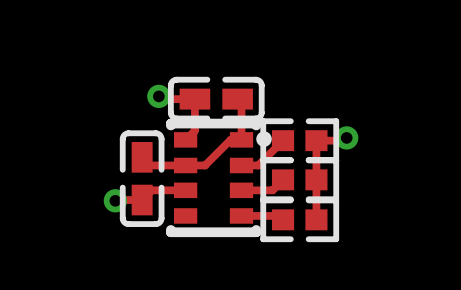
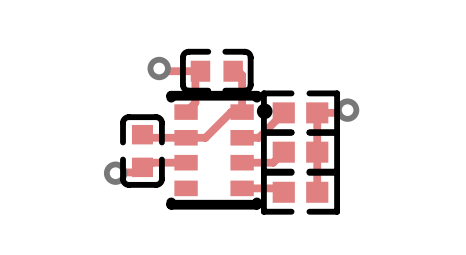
part footprint: [167, 76, 265, 122] -> [180, 48, 254, 94]
part footprint: [119, 130, 165, 228] -> [120, 114, 165, 188]

